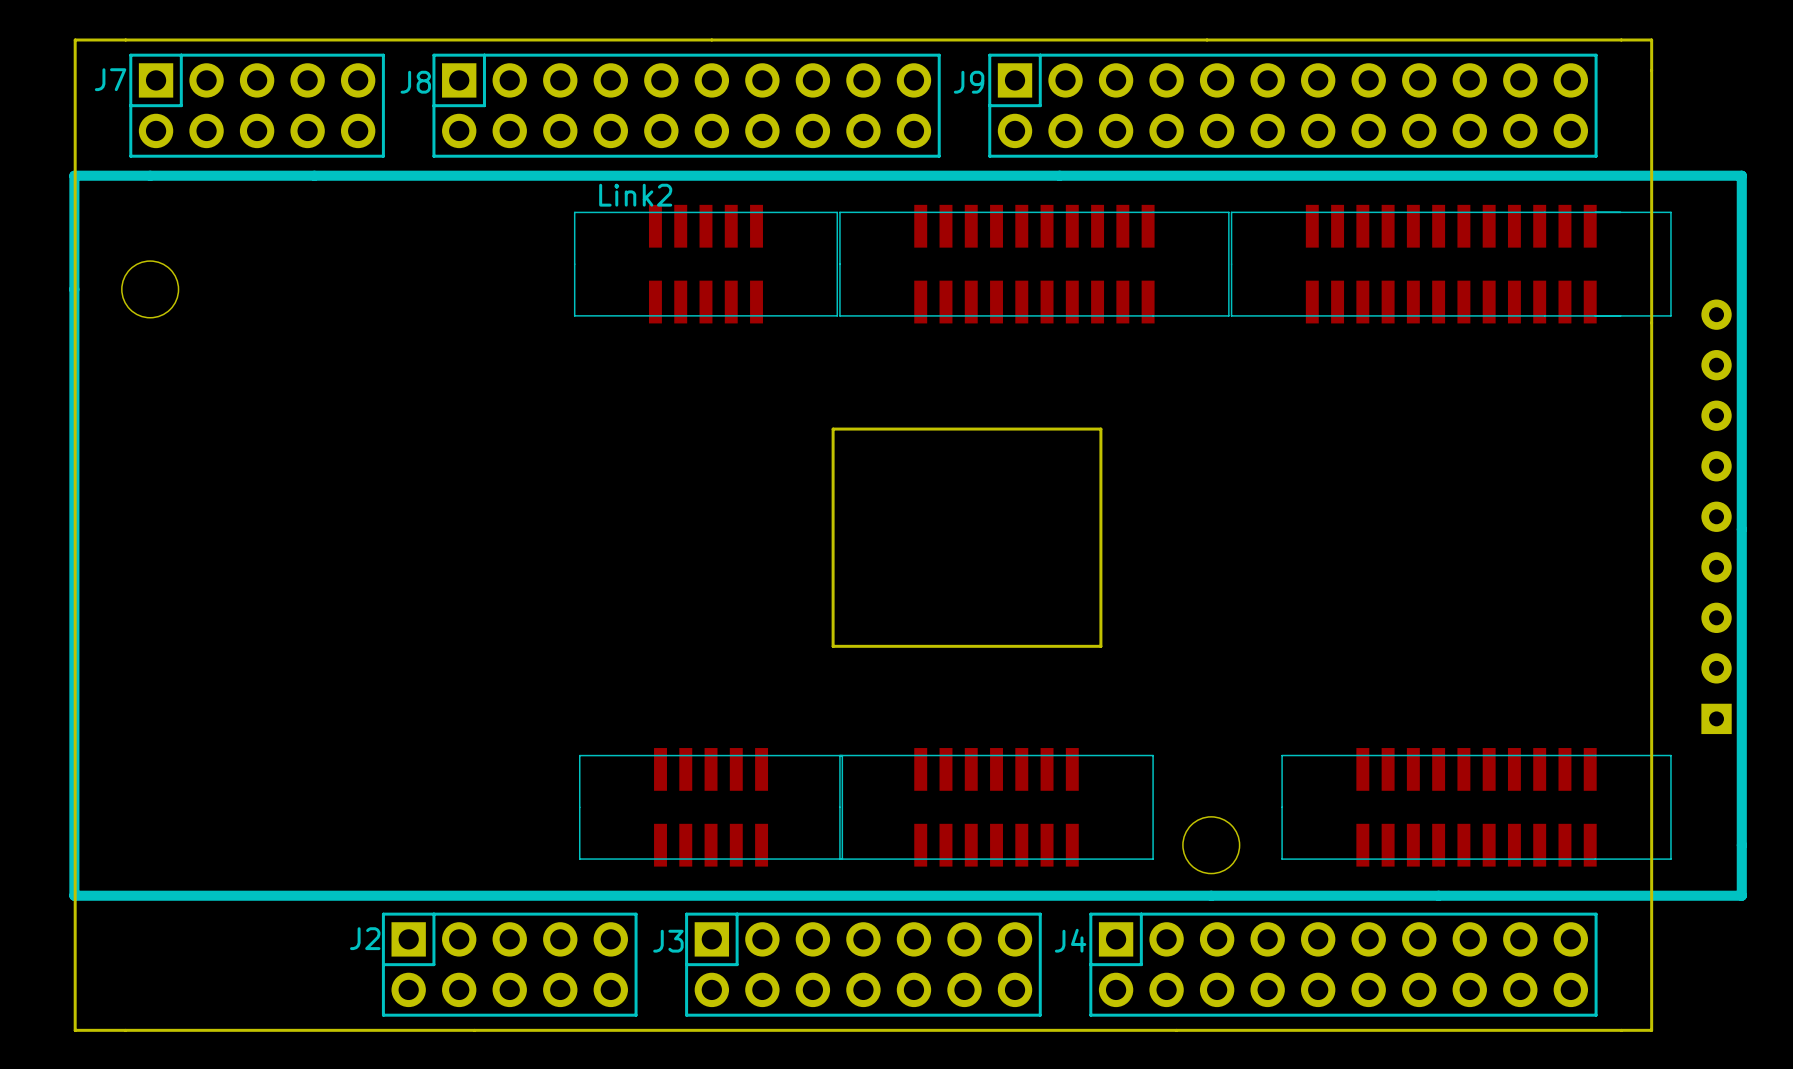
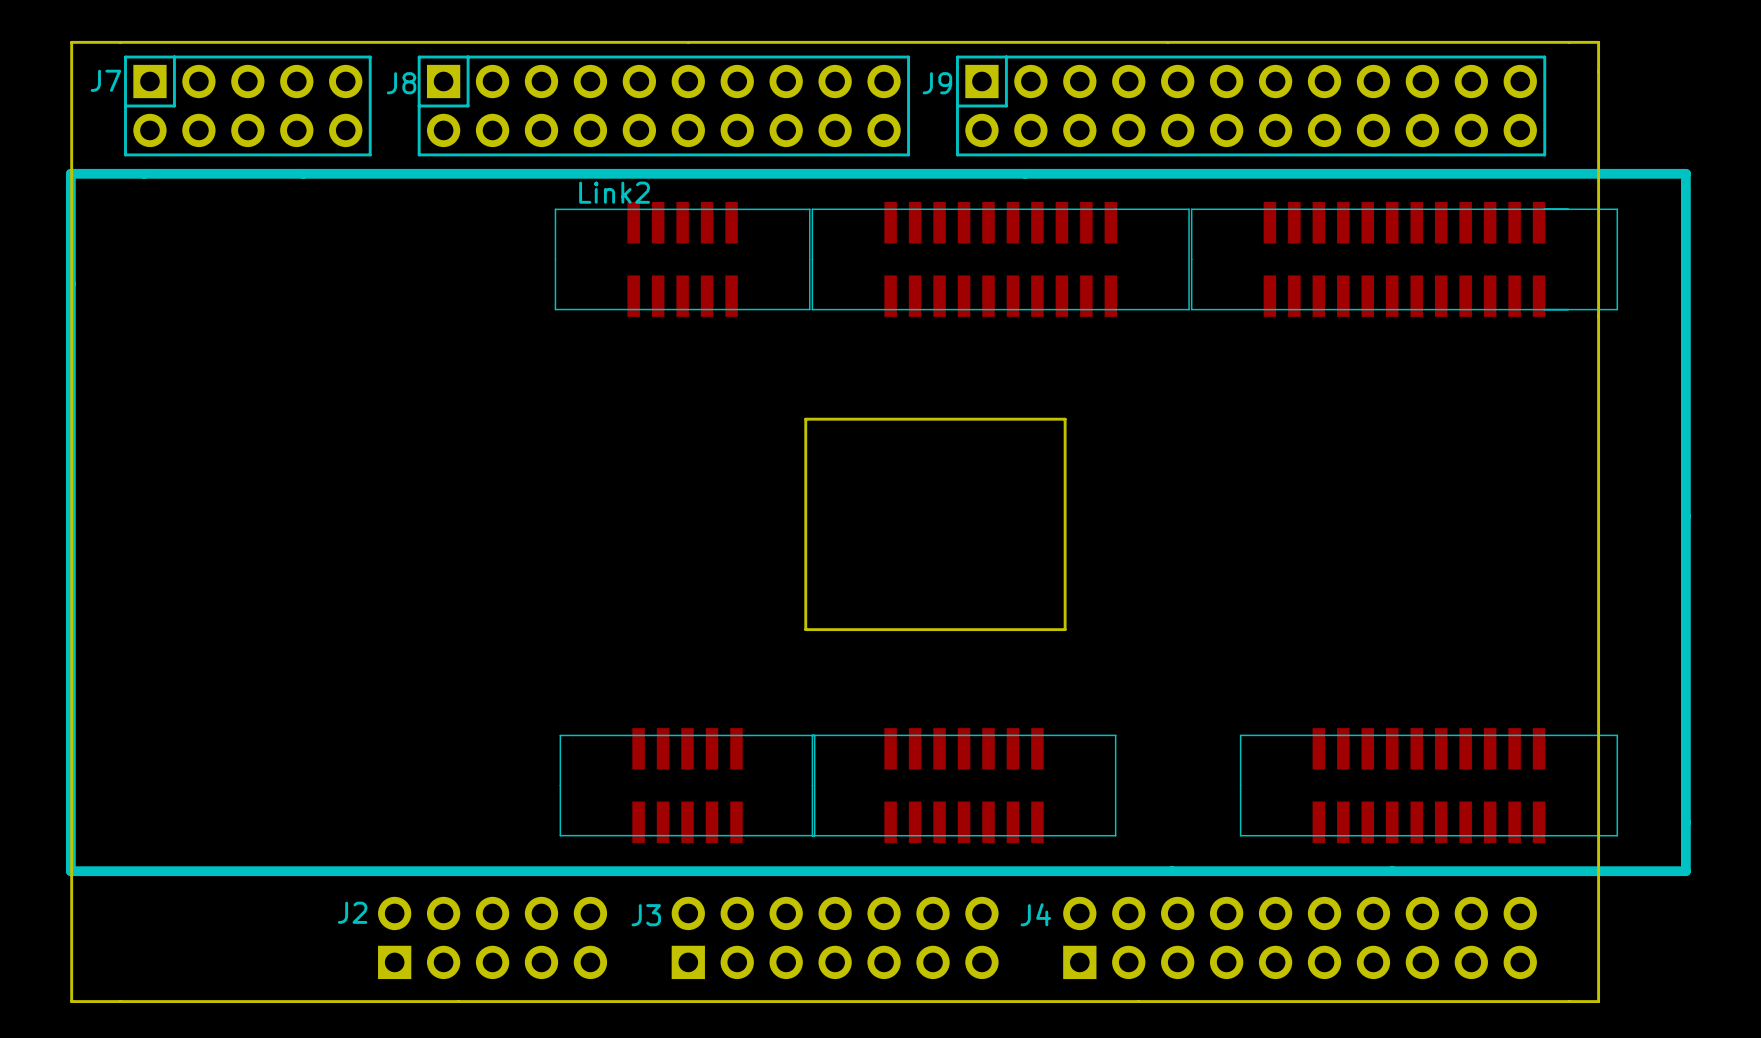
Link2 footprint: [69, 170, 1747, 901] -> [65, 168, 1691, 877]
part side: top (509, 964) -> bottom (492, 937)
part side: top (863, 964) -> bottom (835, 937)
part side: top (1343, 964) -> bottom (1300, 937)

